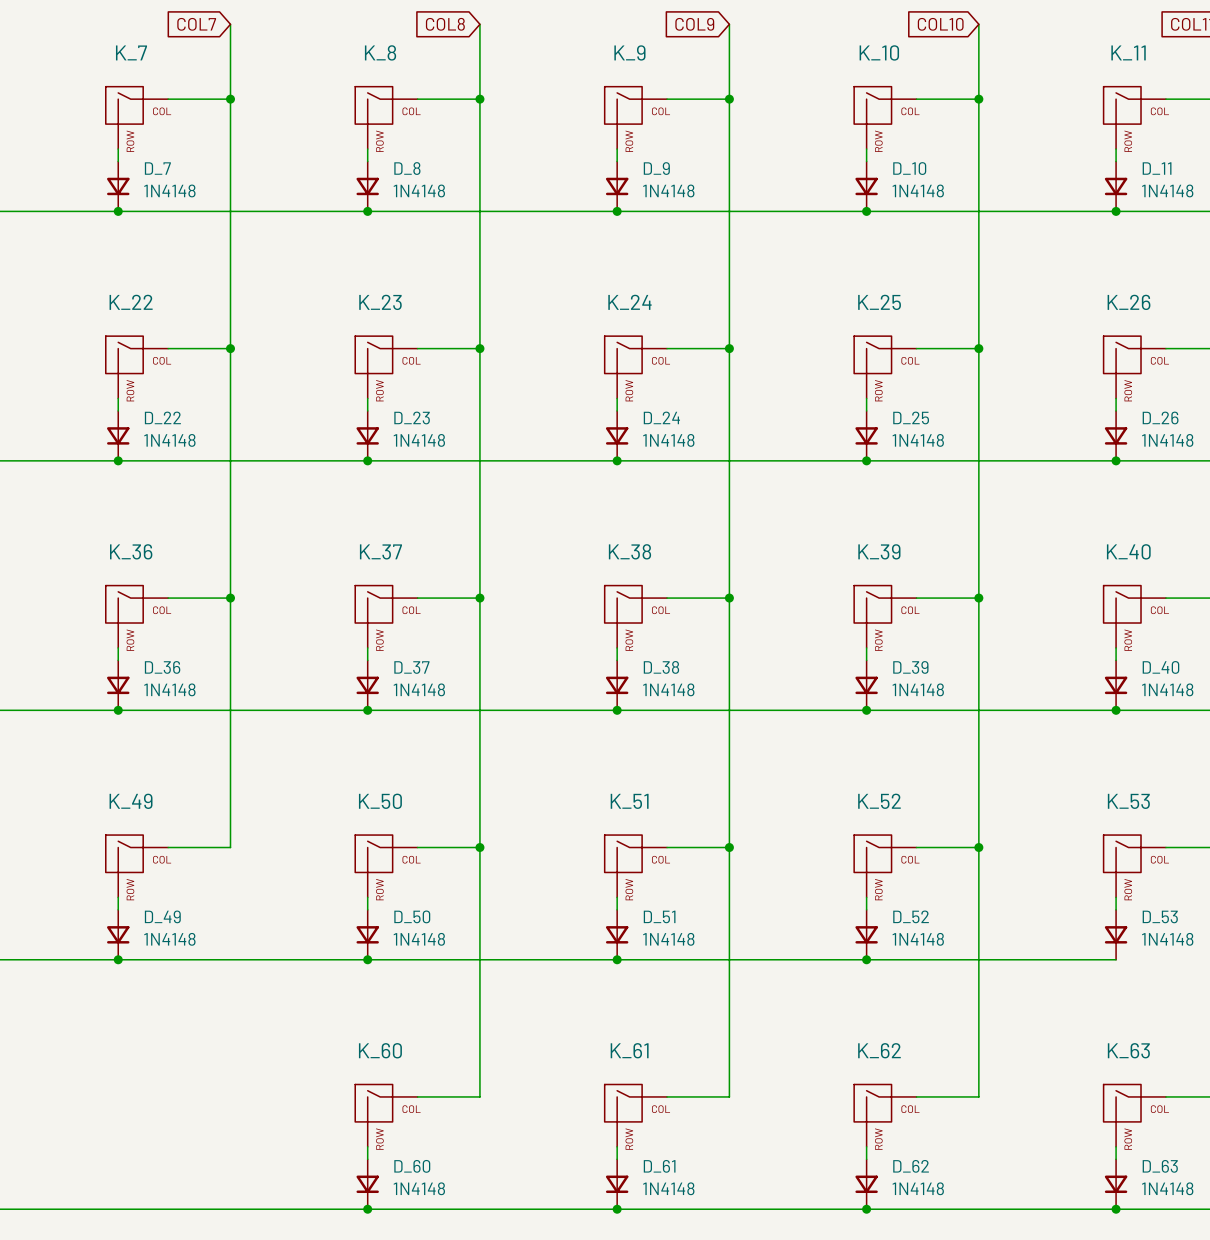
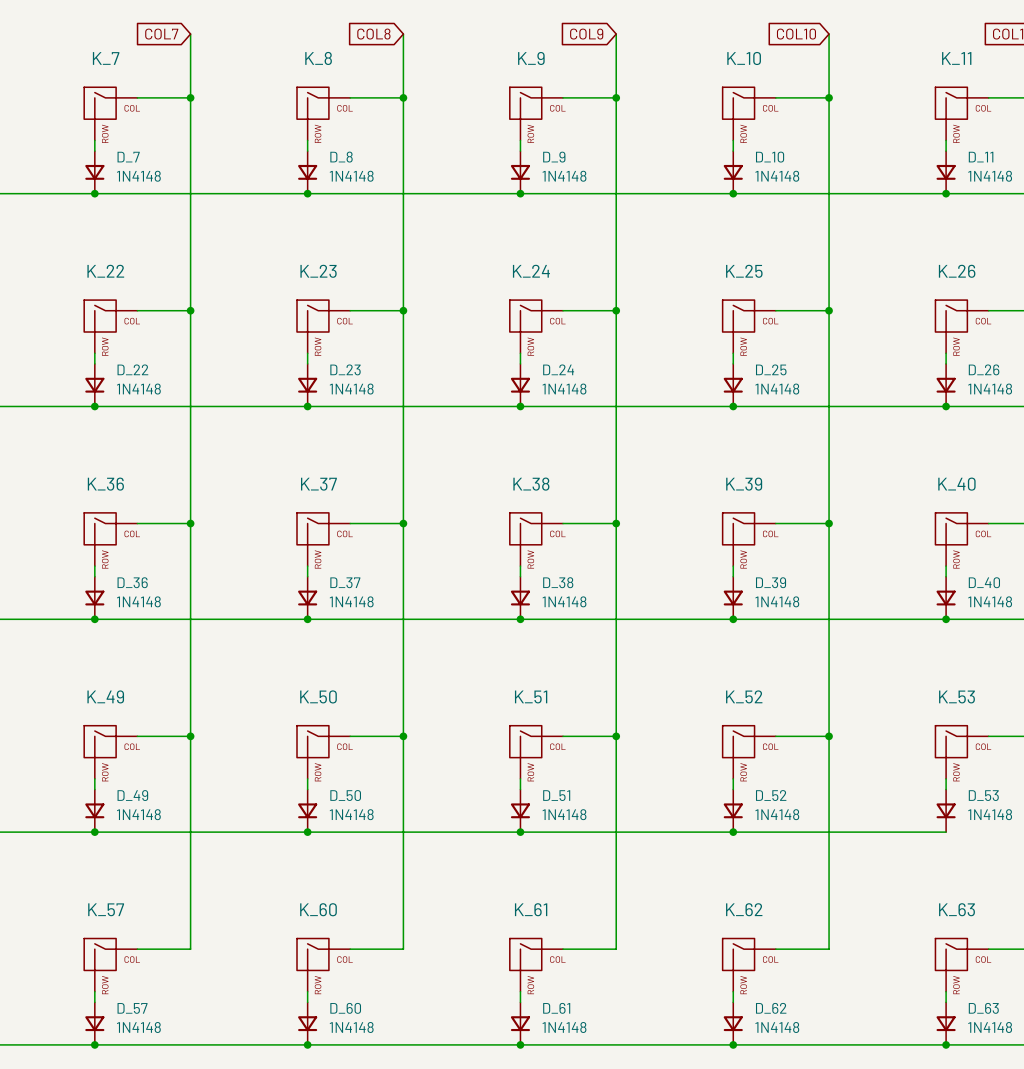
wire: none -> (190, 736) (190, 949) (137, 949)
junction: none -> (190, 736)
K_57: none -> (110, 965)
wire: none -> (94, 991) (94, 1002)
D_57: none -> 1N4148 (94, 1023)
junction: none -> (94, 1044)

